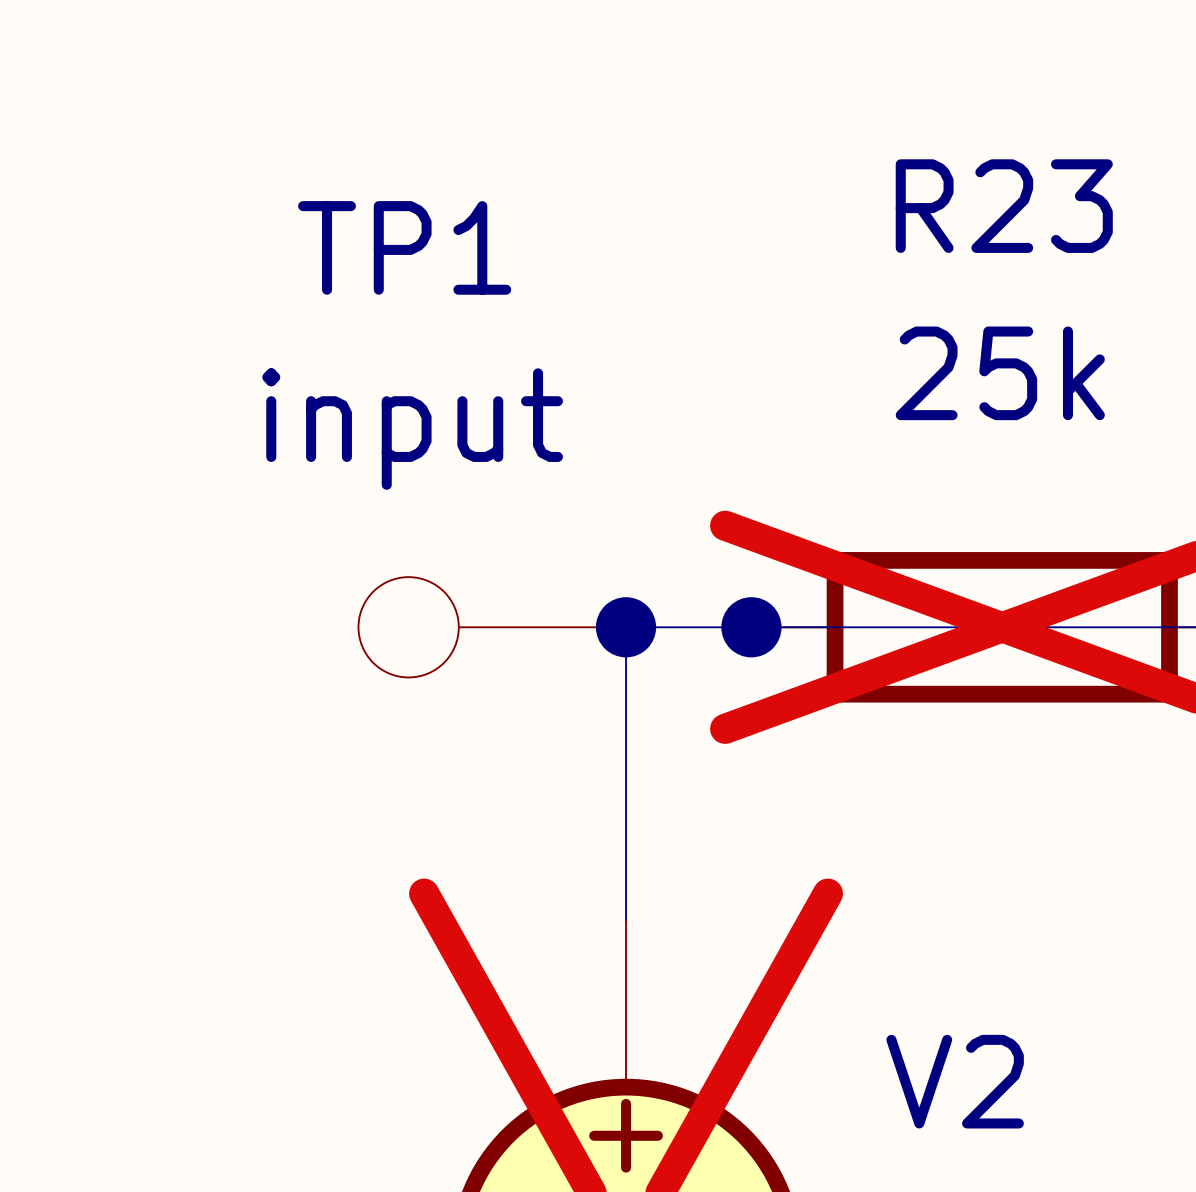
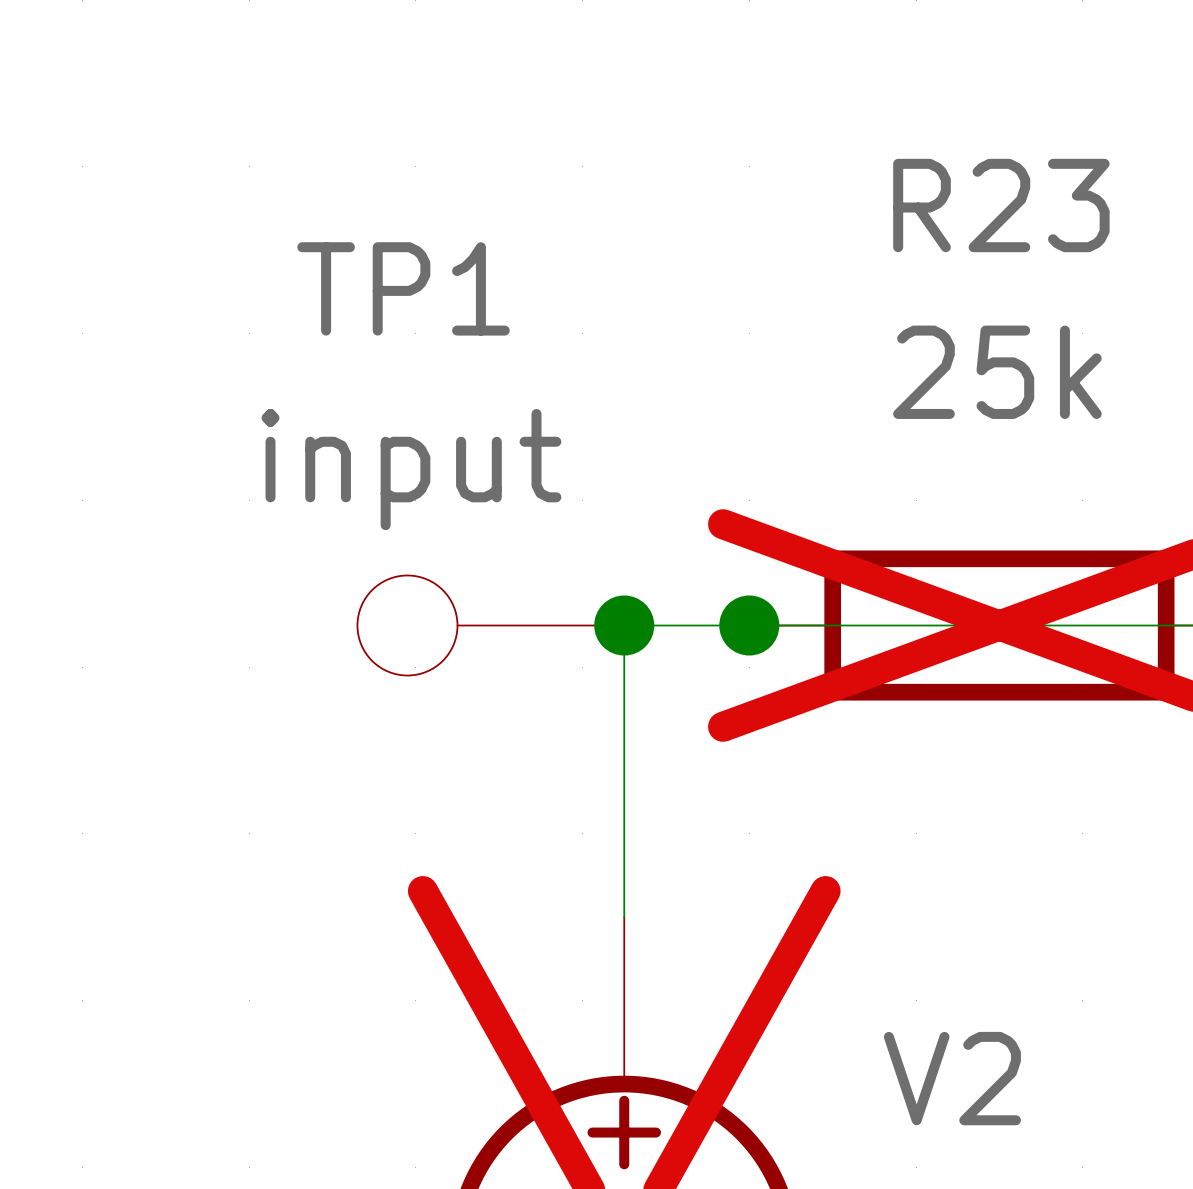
TP1 name position: TP1 (404, 247) -> TP1 (403, 288)
TP1 value position: input (412, 429) -> input (411, 469)

